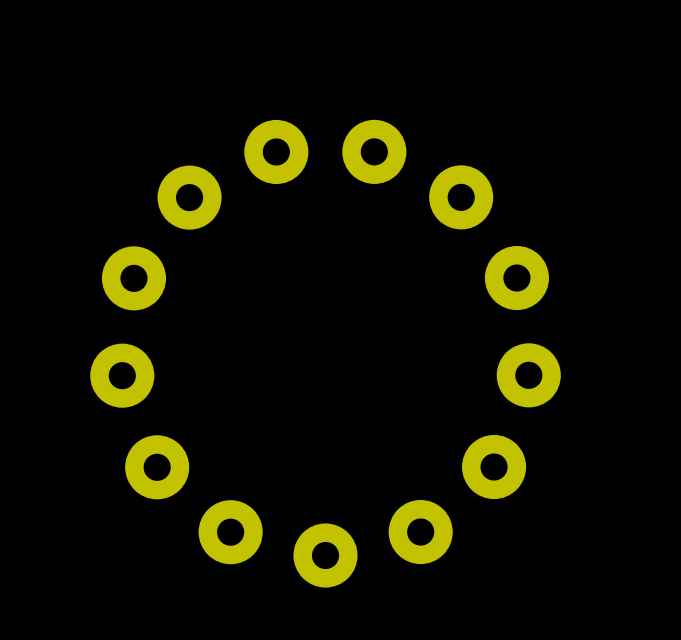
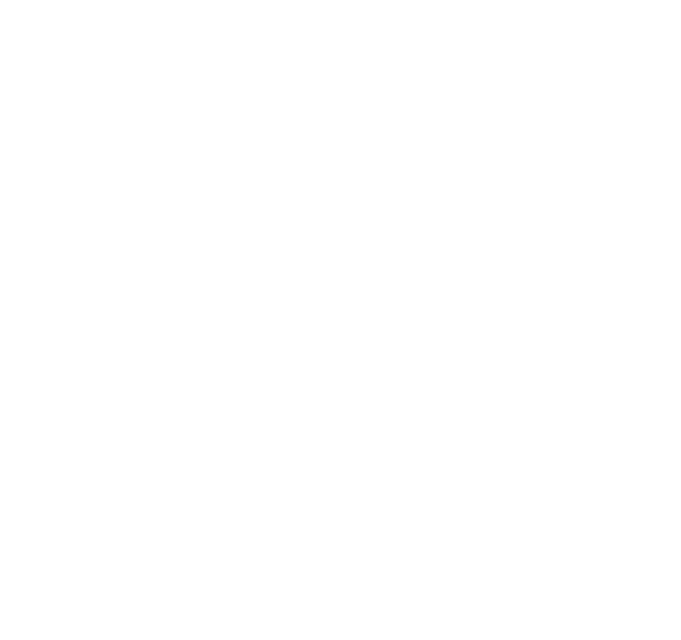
part: (325, 353) -> none

